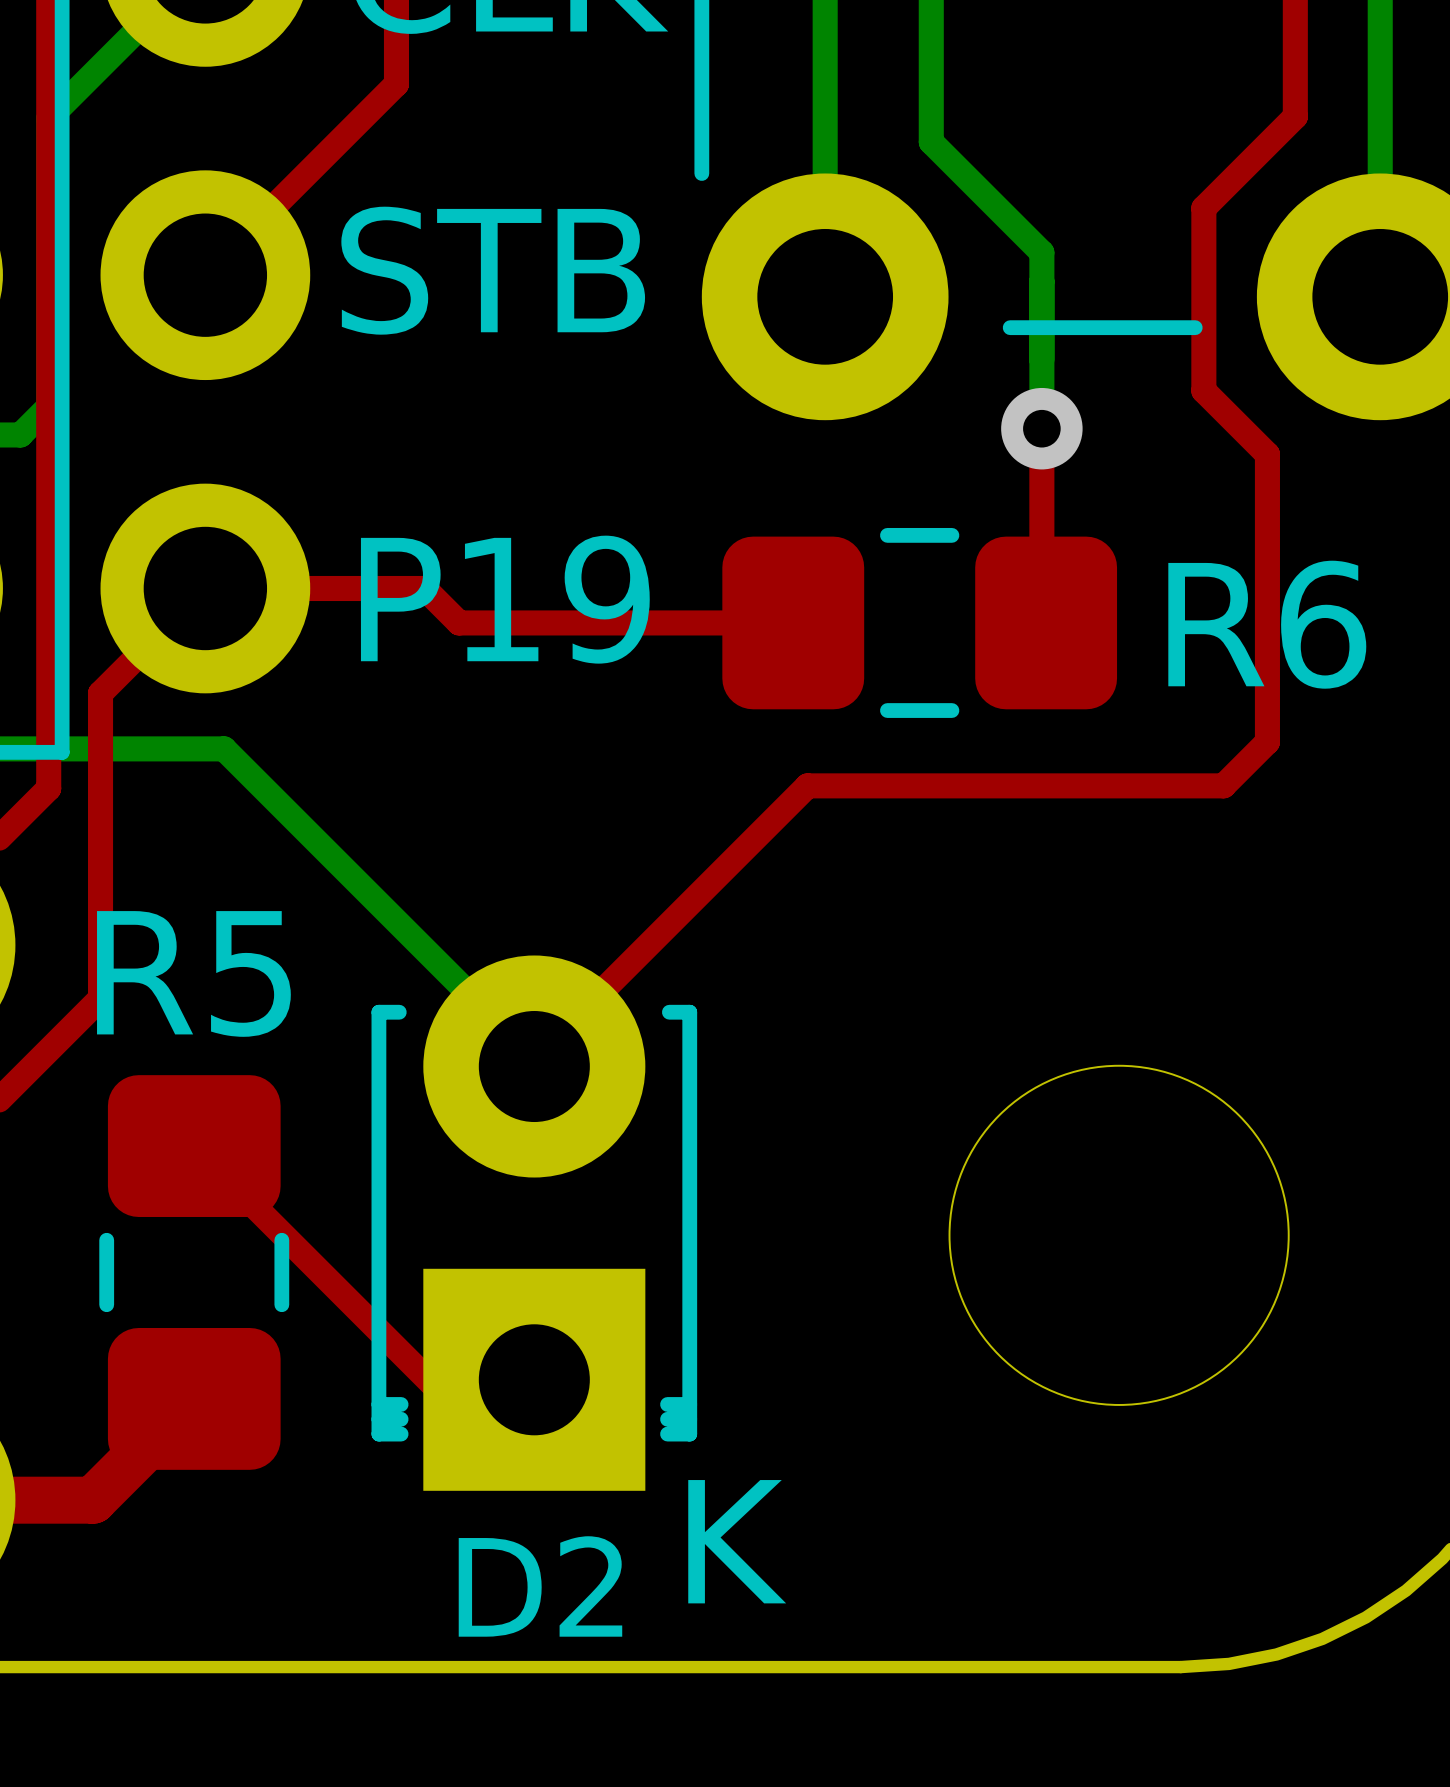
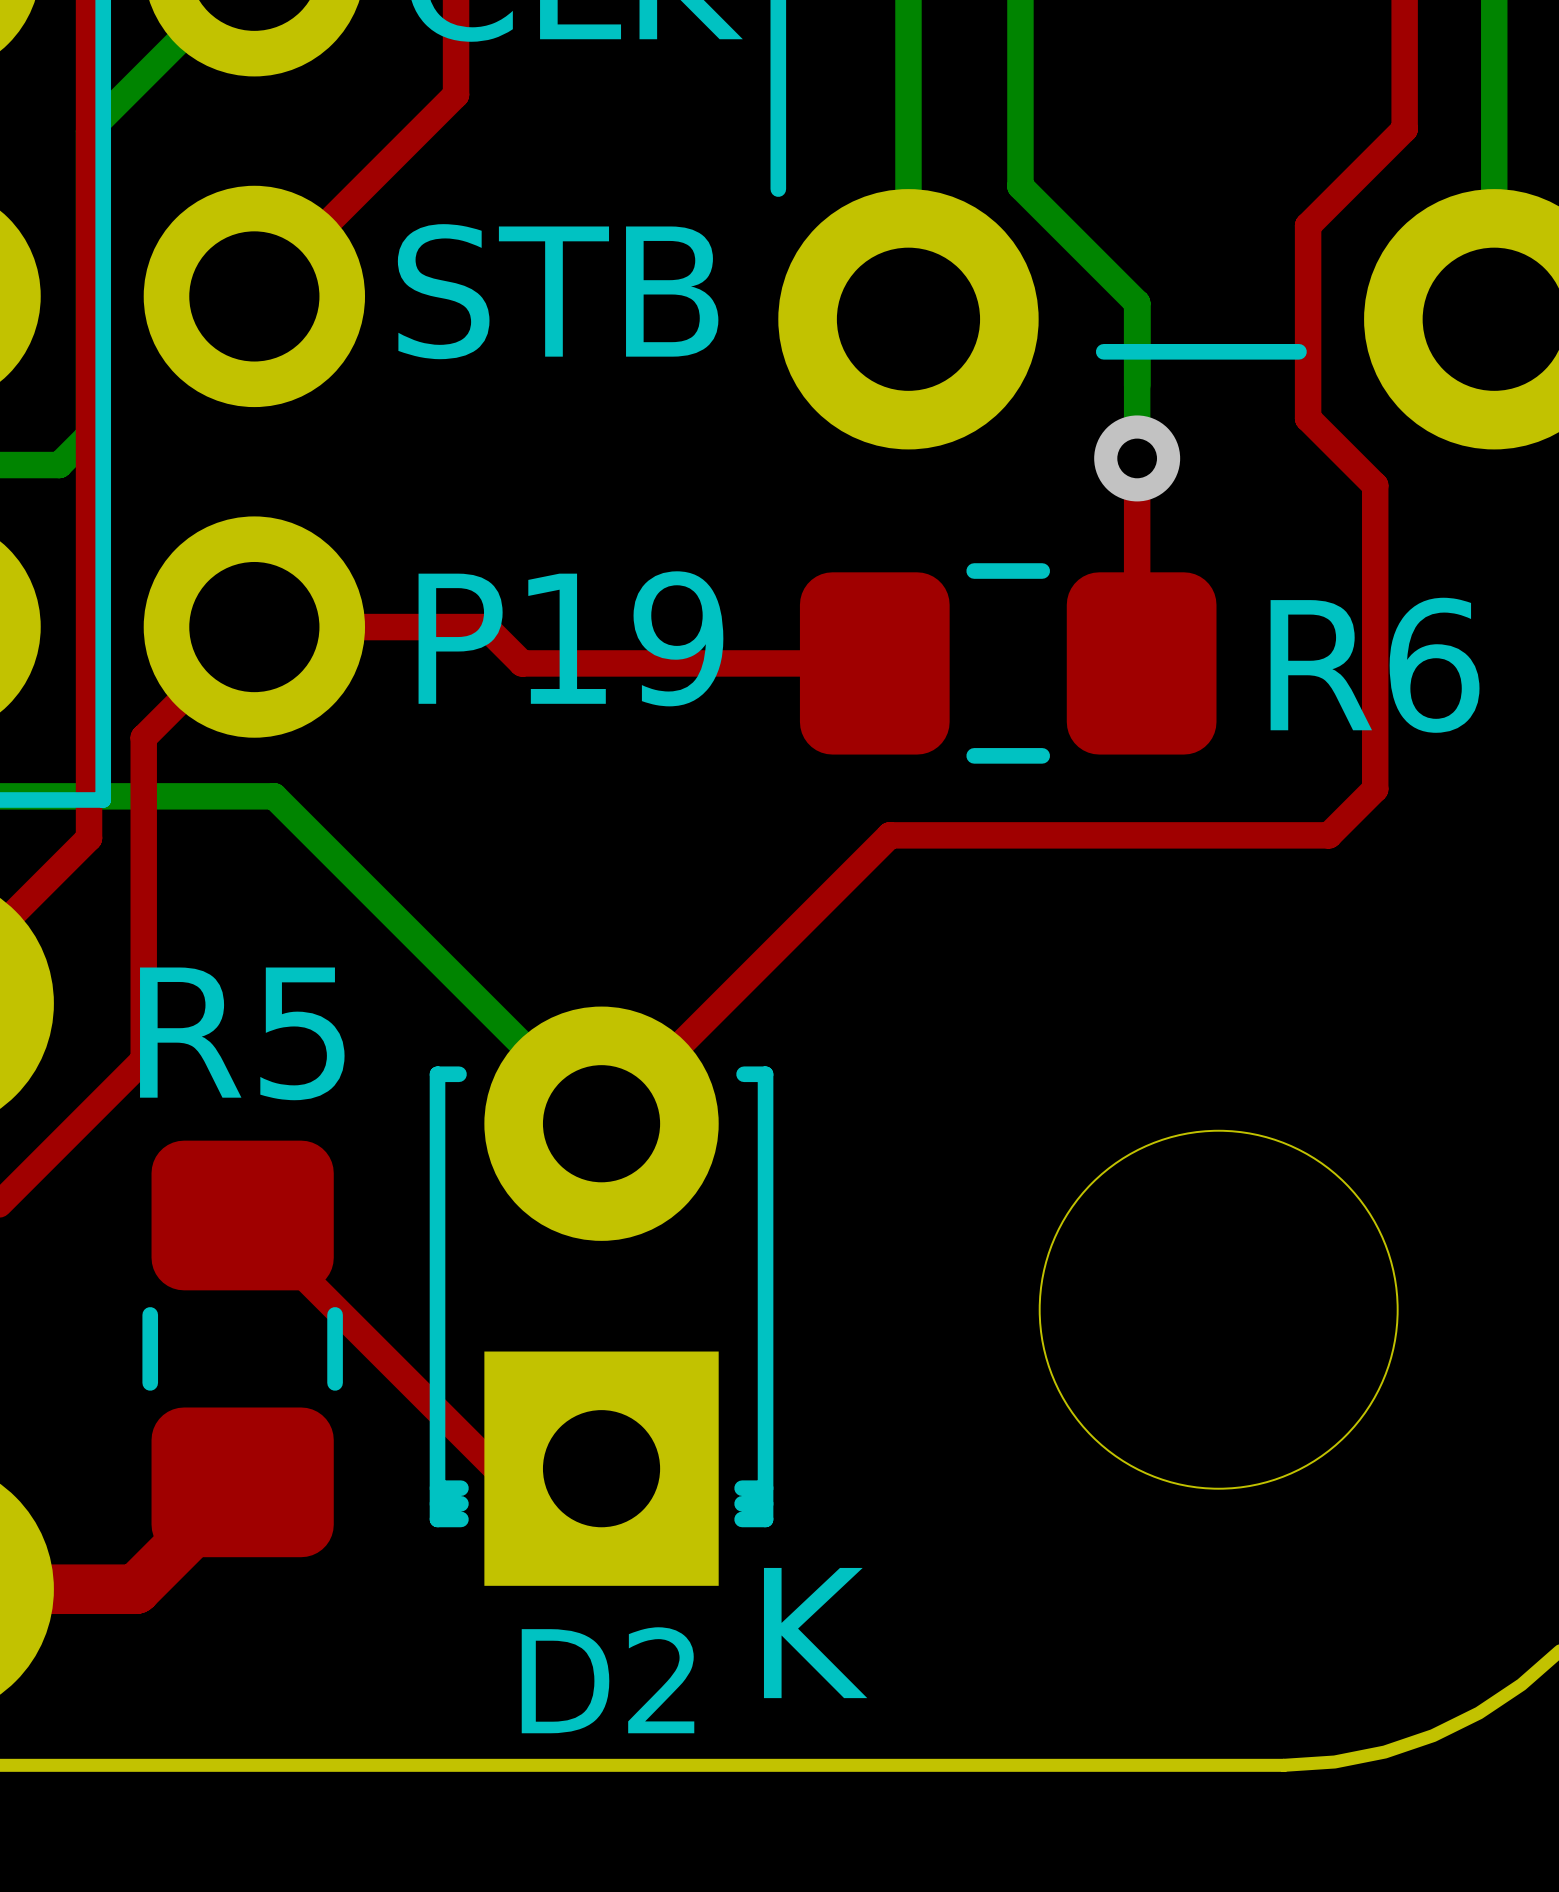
bottom track: (931, 142) (1041, 252) (1041, 281) -> (1020, 155) (1020, 186) (1137, 303)
D2 footprint: [371, 955, 698, 1491] -> [429, 1006, 774, 1586]

